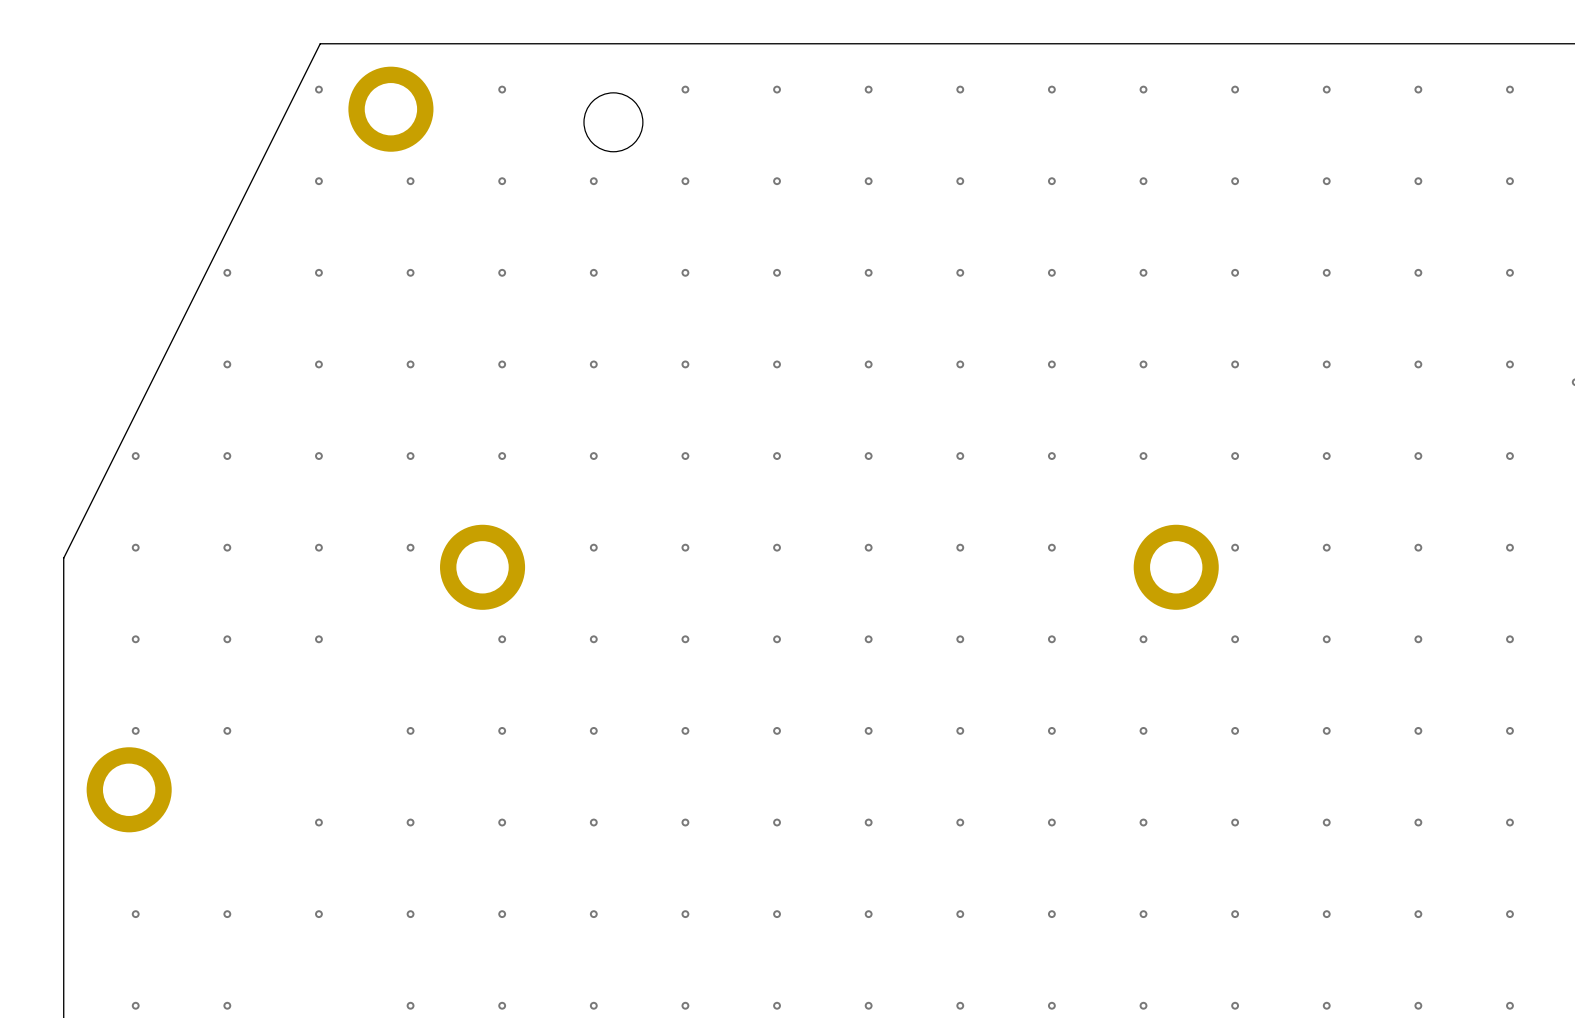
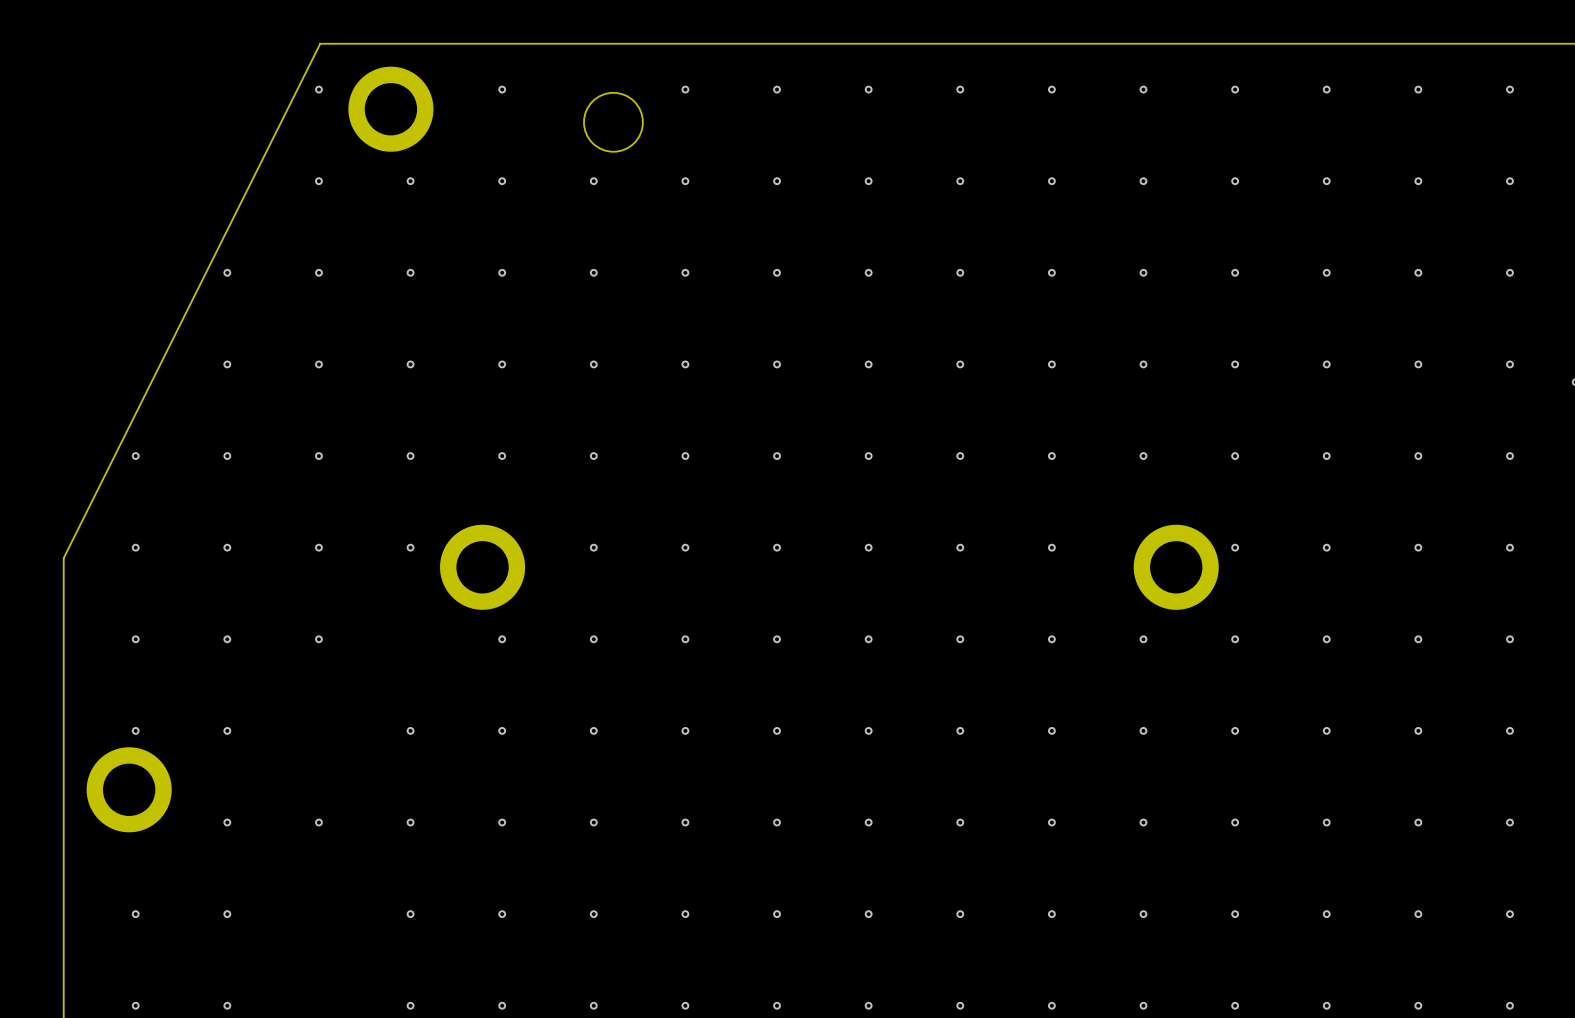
via: none -> (227, 822)
via: (318, 914) -> none

